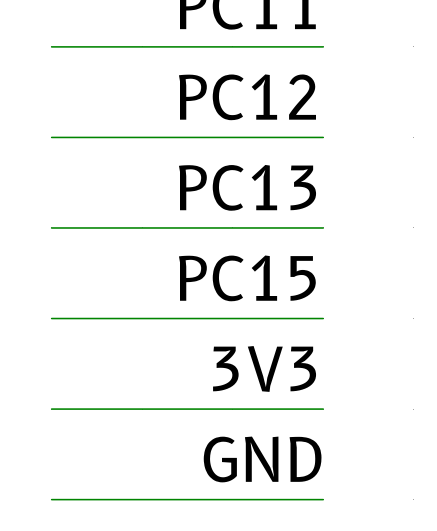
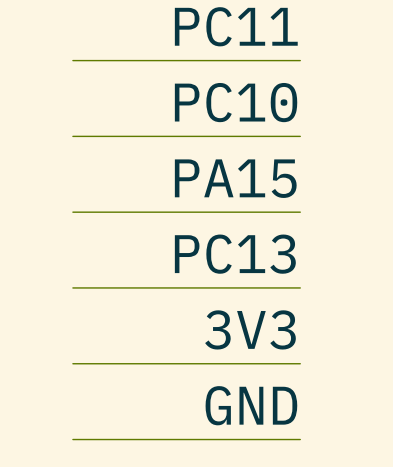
label: PC12 (247, 97) -> PC10 (236, 102)
label: PC13 (247, 187) -> PA15 (235, 178)
label: PC15 (247, 278) -> PC13 (235, 254)

